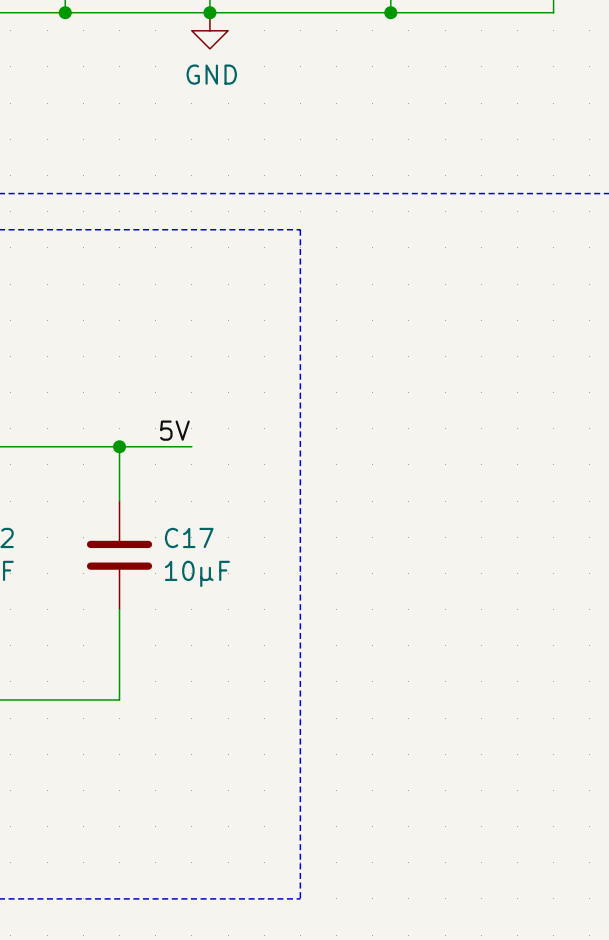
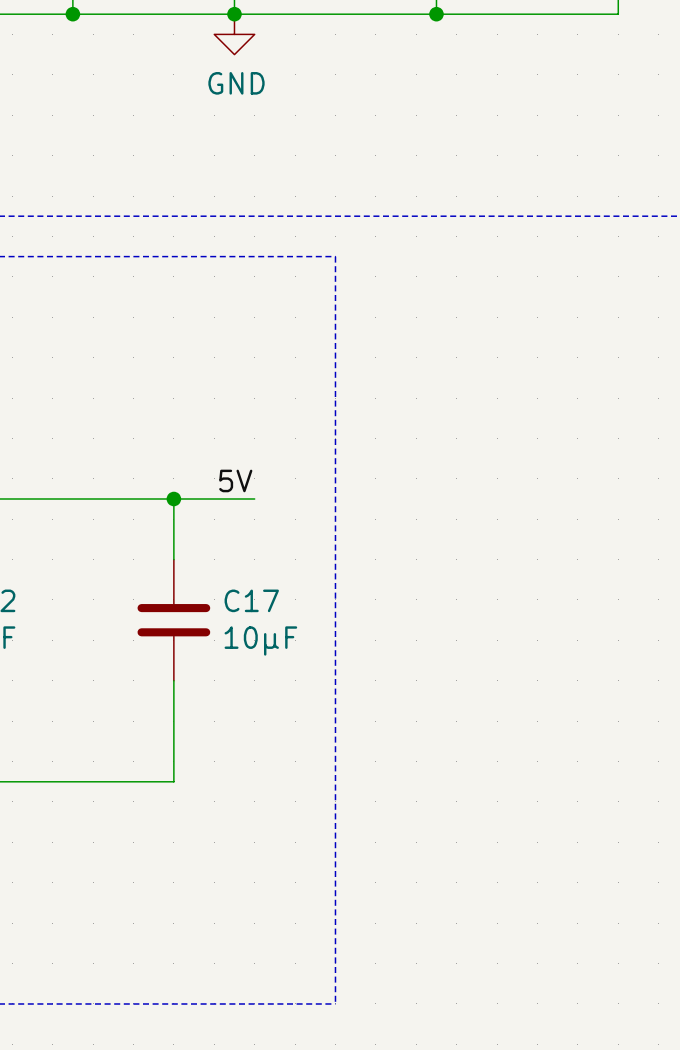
label position: 5V (174, 430) -> 5V (235, 480)
wire: (119, 446) (119, 501) -> (173, 498) (173, 559)
junction position: (119, 446) -> (173, 498)
wire: none -> (214, 498) (254, 498)
C17 position: (119, 555) -> (173, 620)
wire: (119, 609) (119, 699) -> (173, 680) (173, 781) (133, 781)

